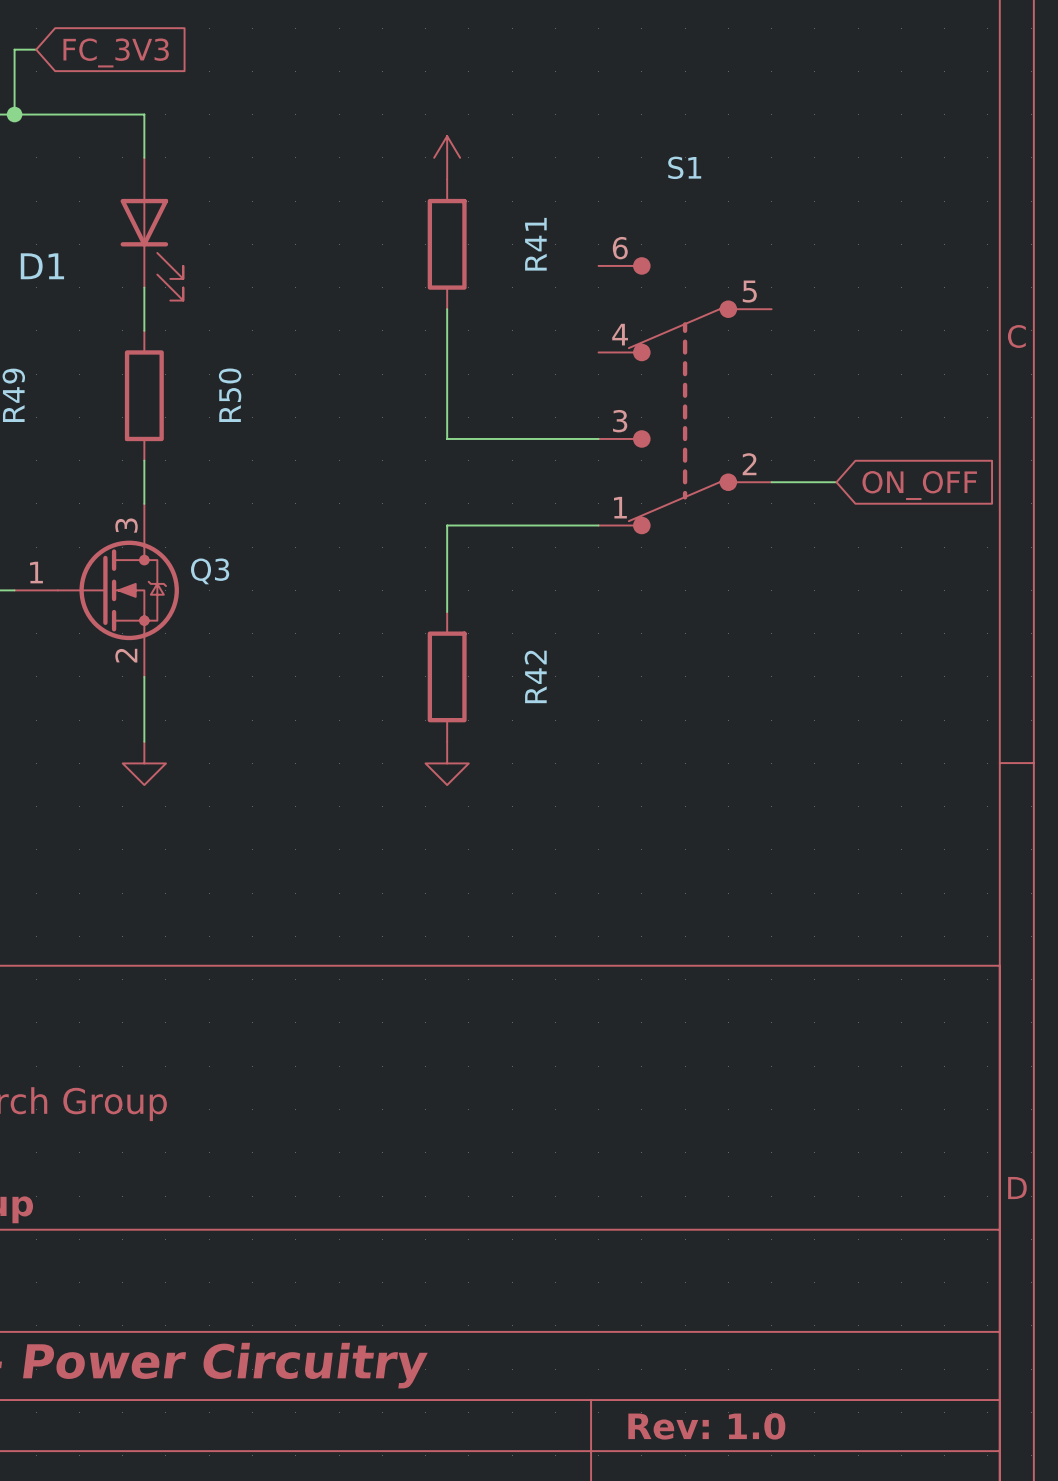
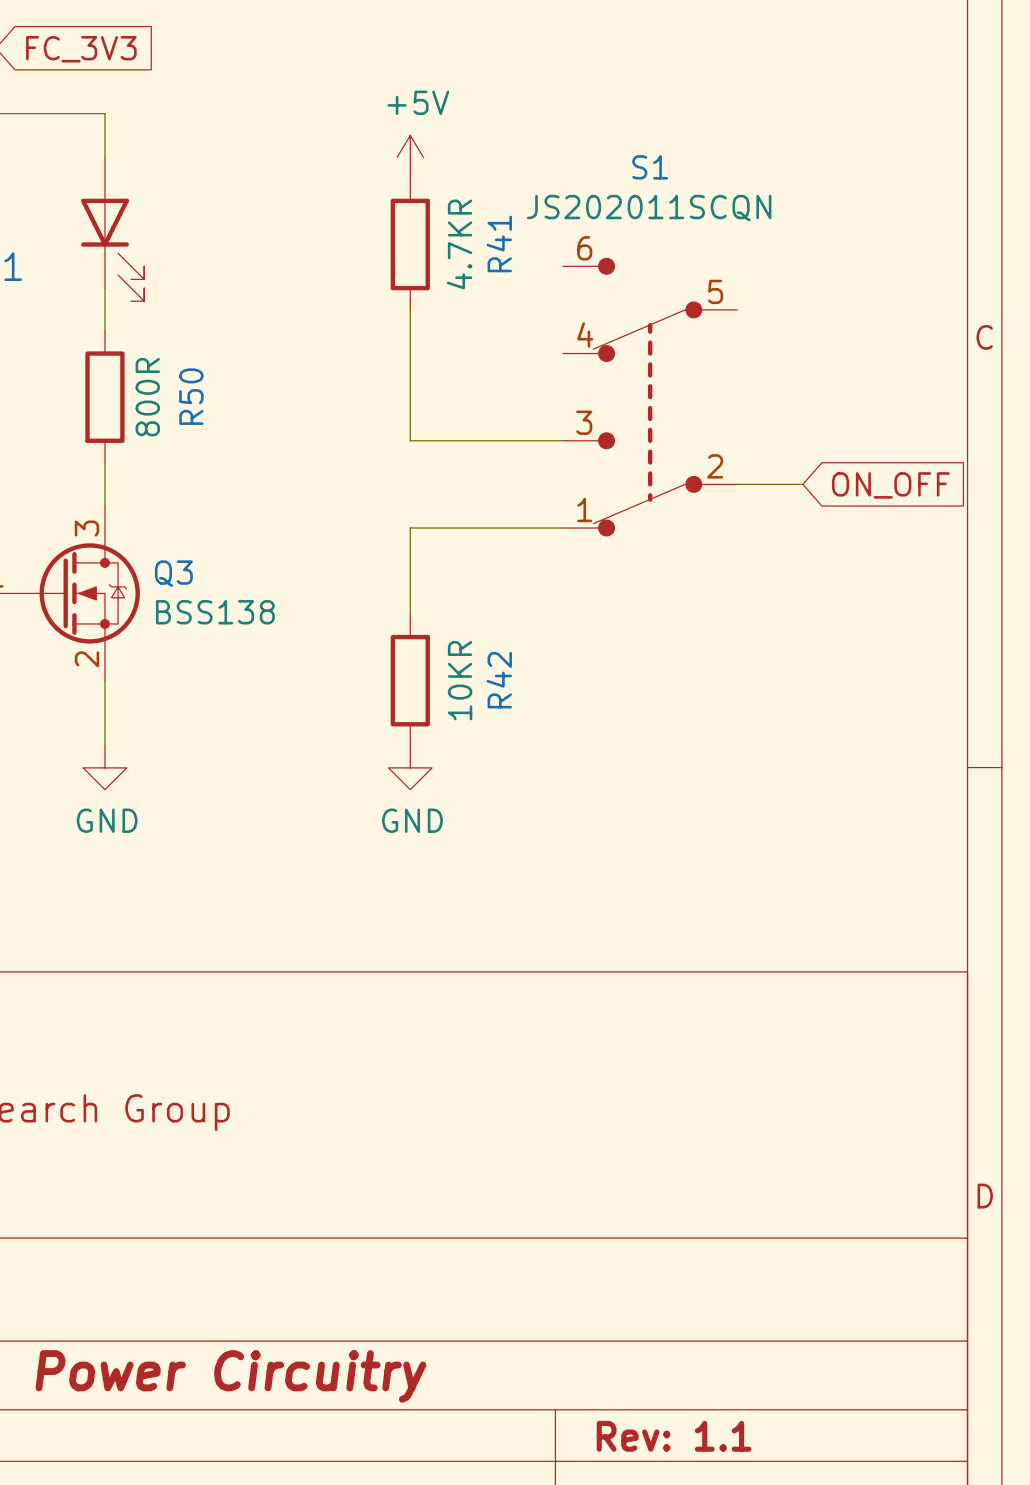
power symbol text: none -> +5V (418, 102)
S1 value: none -> JS202011SCQN (649, 208)
R41 value: none -> 4.7KR (459, 244)
R50 value: none -> 800R (147, 397)
Q3 value: none -> BSS138 (215, 612)
R42 value: none -> 10KR (460, 680)
power symbol text: none -> GND (107, 820)
power symbol text: none -> GND (412, 820)
title block: Rev: 1.0 (706, 1426) -> Rev: 1.1 (674, 1436)

